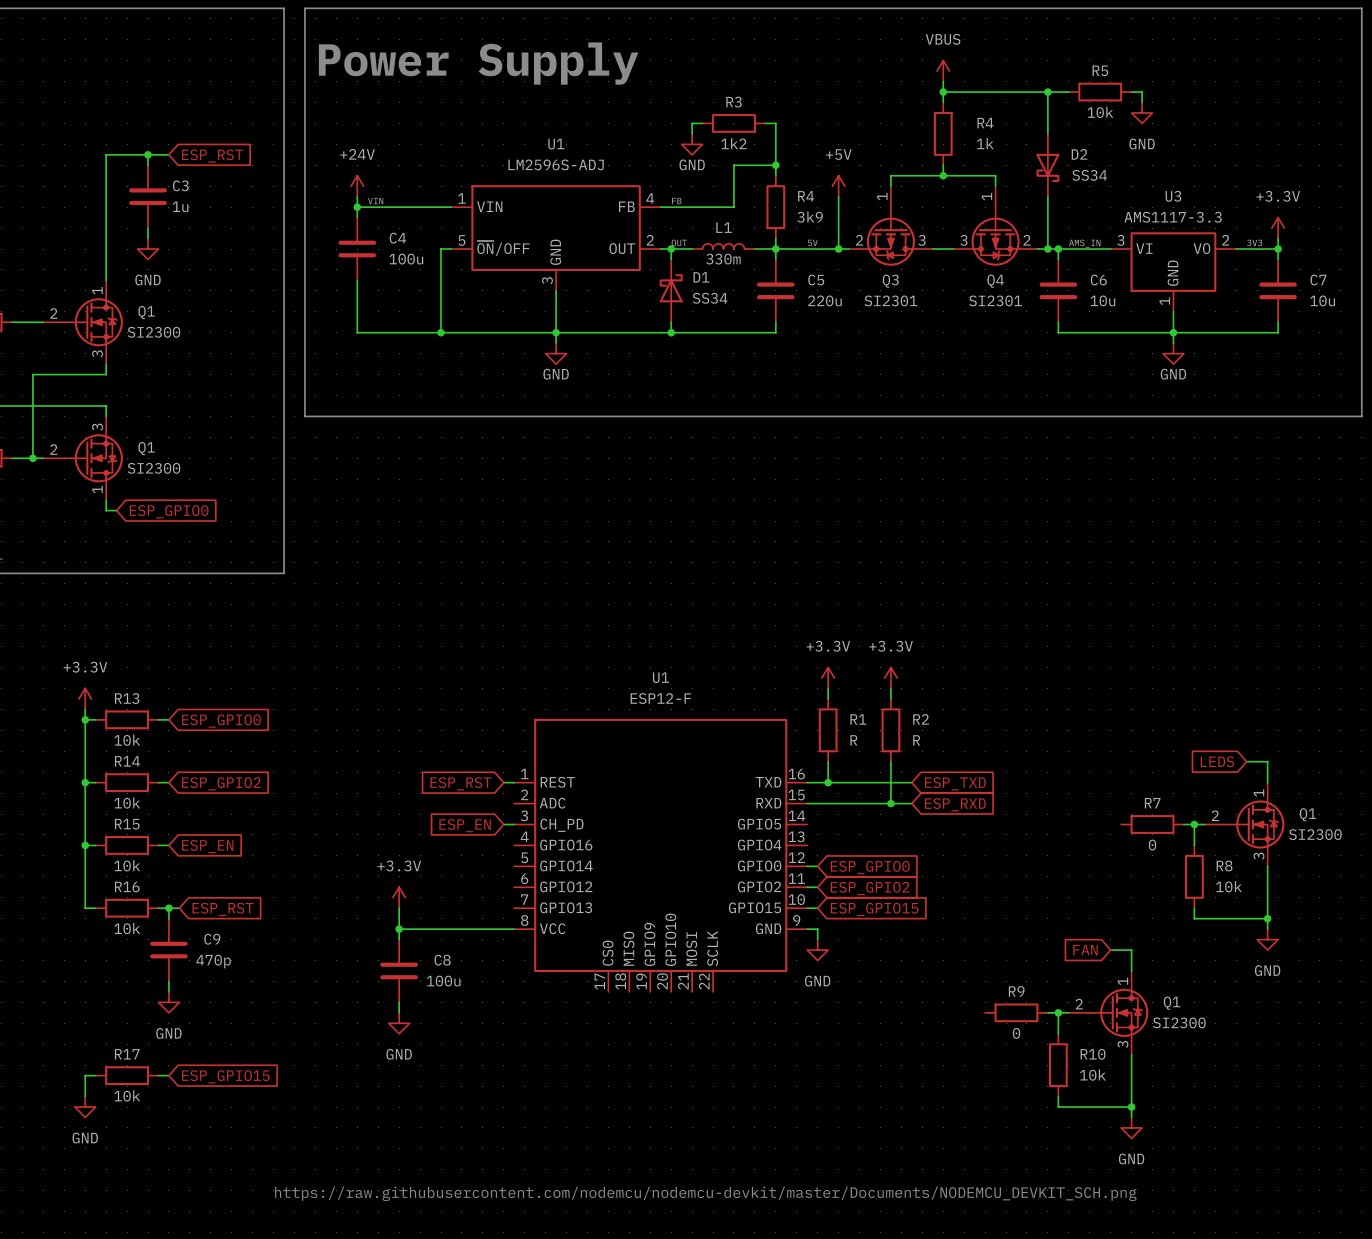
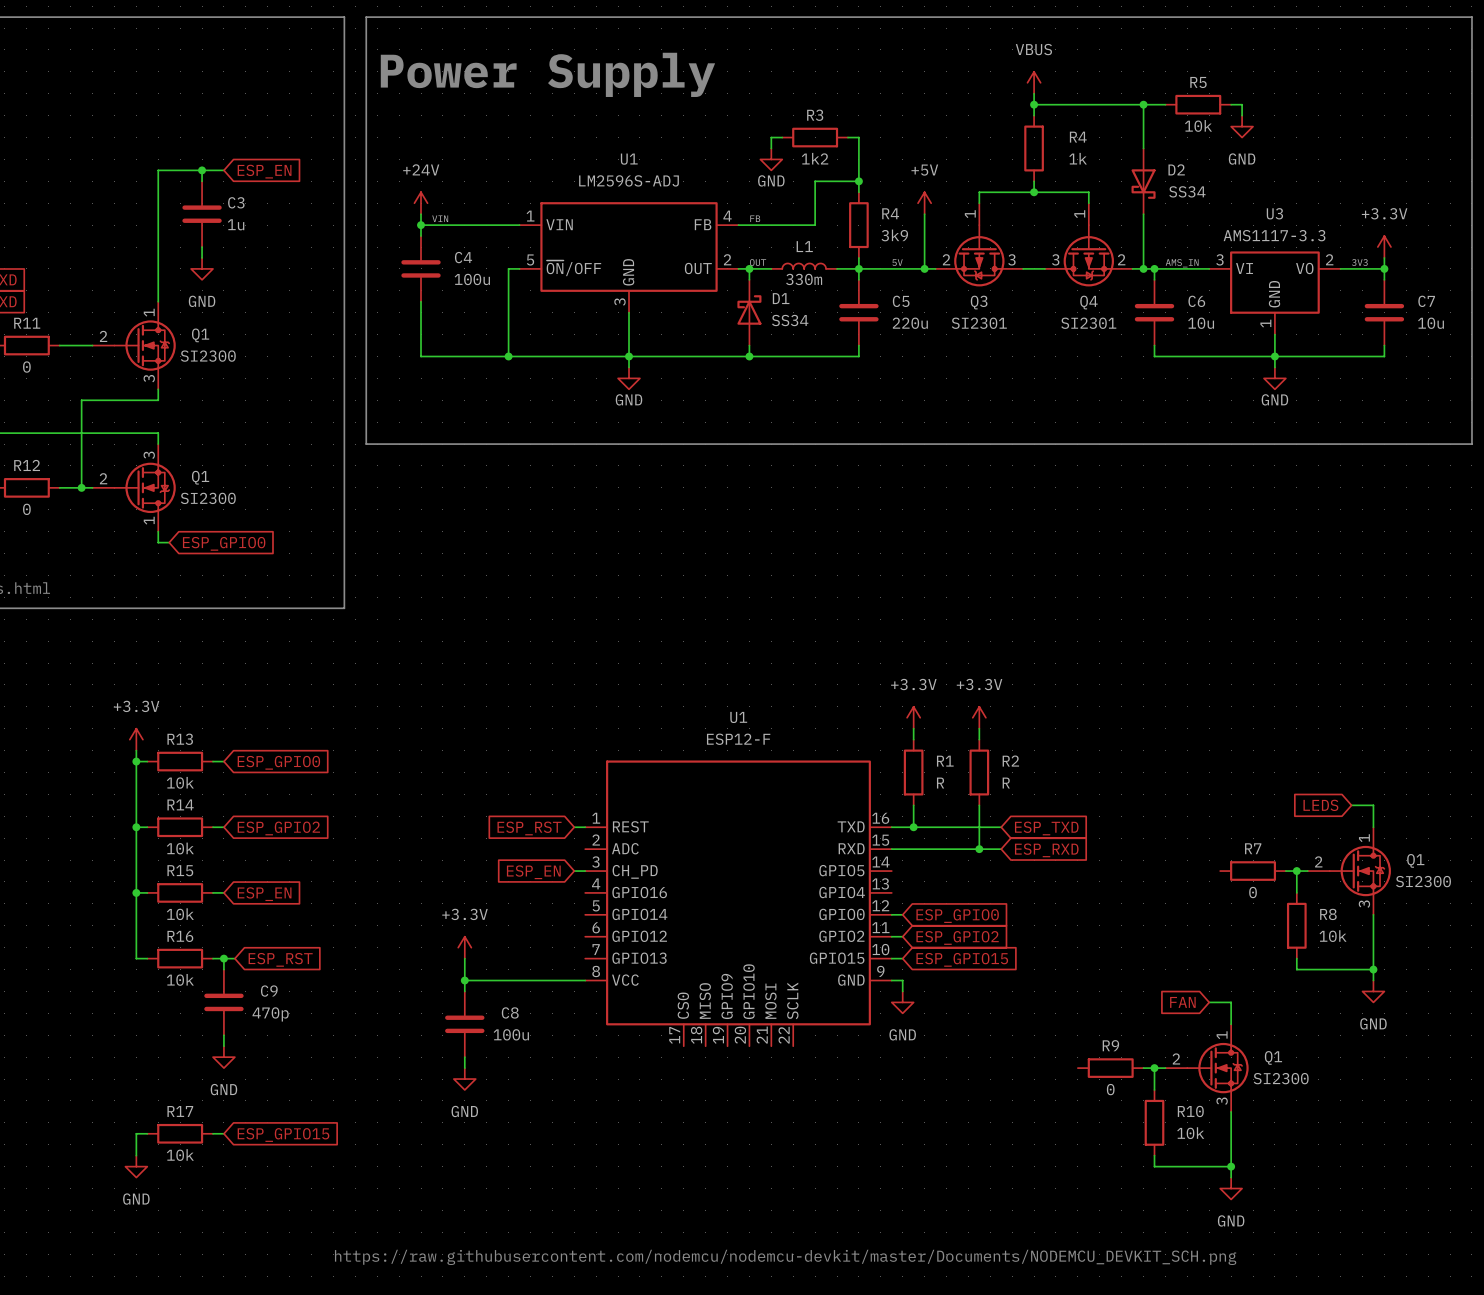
global label: ESP_RST (212, 156) -> ESP_EN (264, 171)

